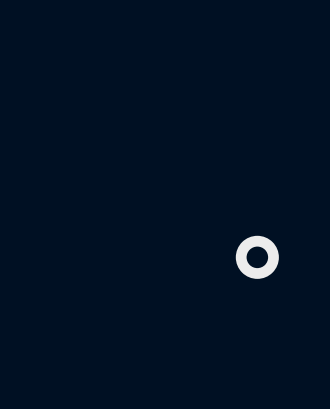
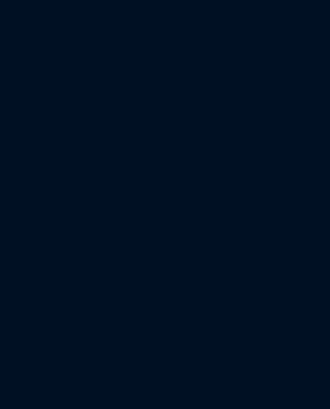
via: (257, 257) -> none

